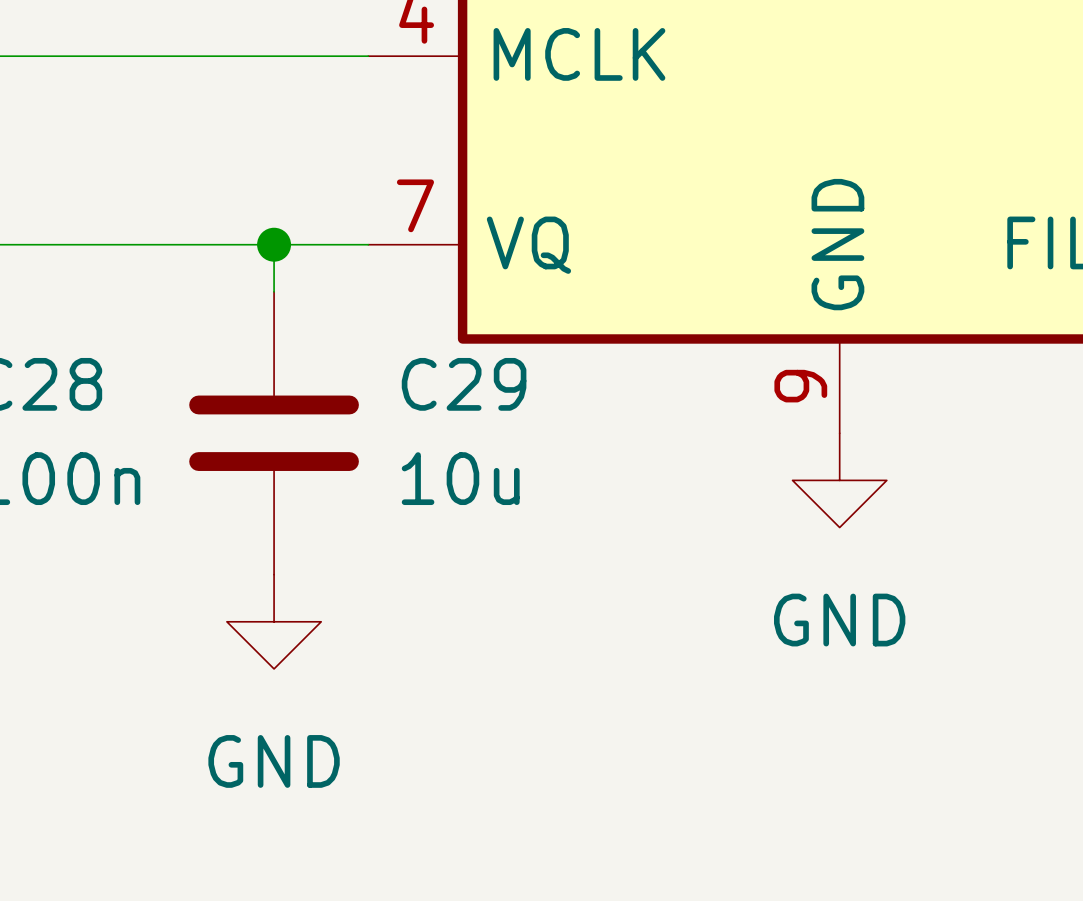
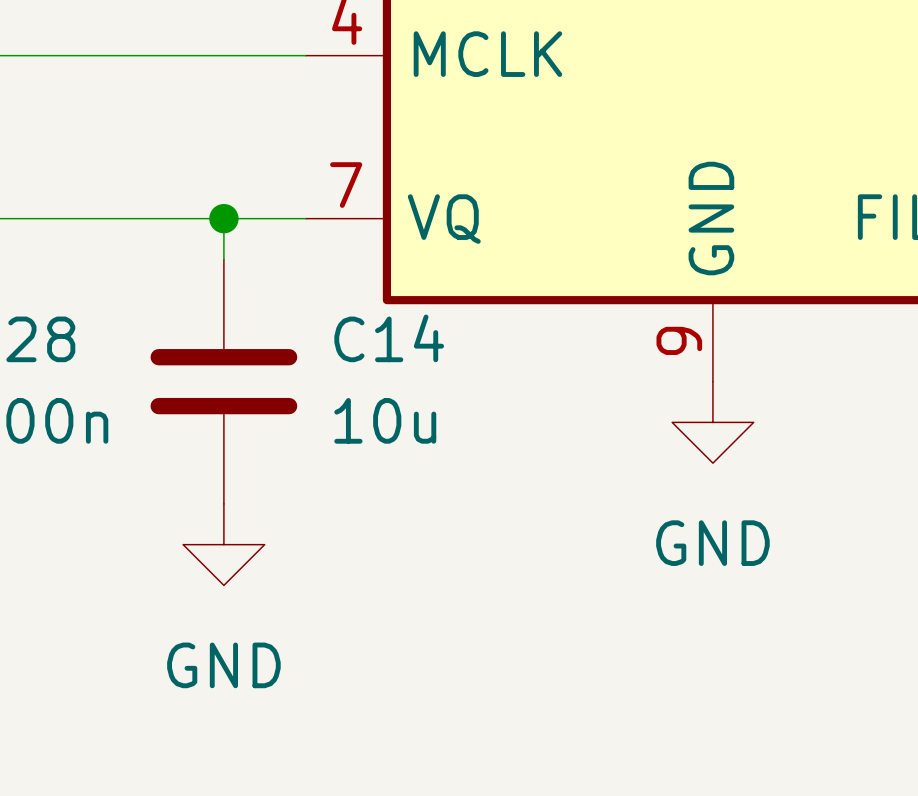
C29 name: C29 (464, 384) -> C14 (389, 338)

